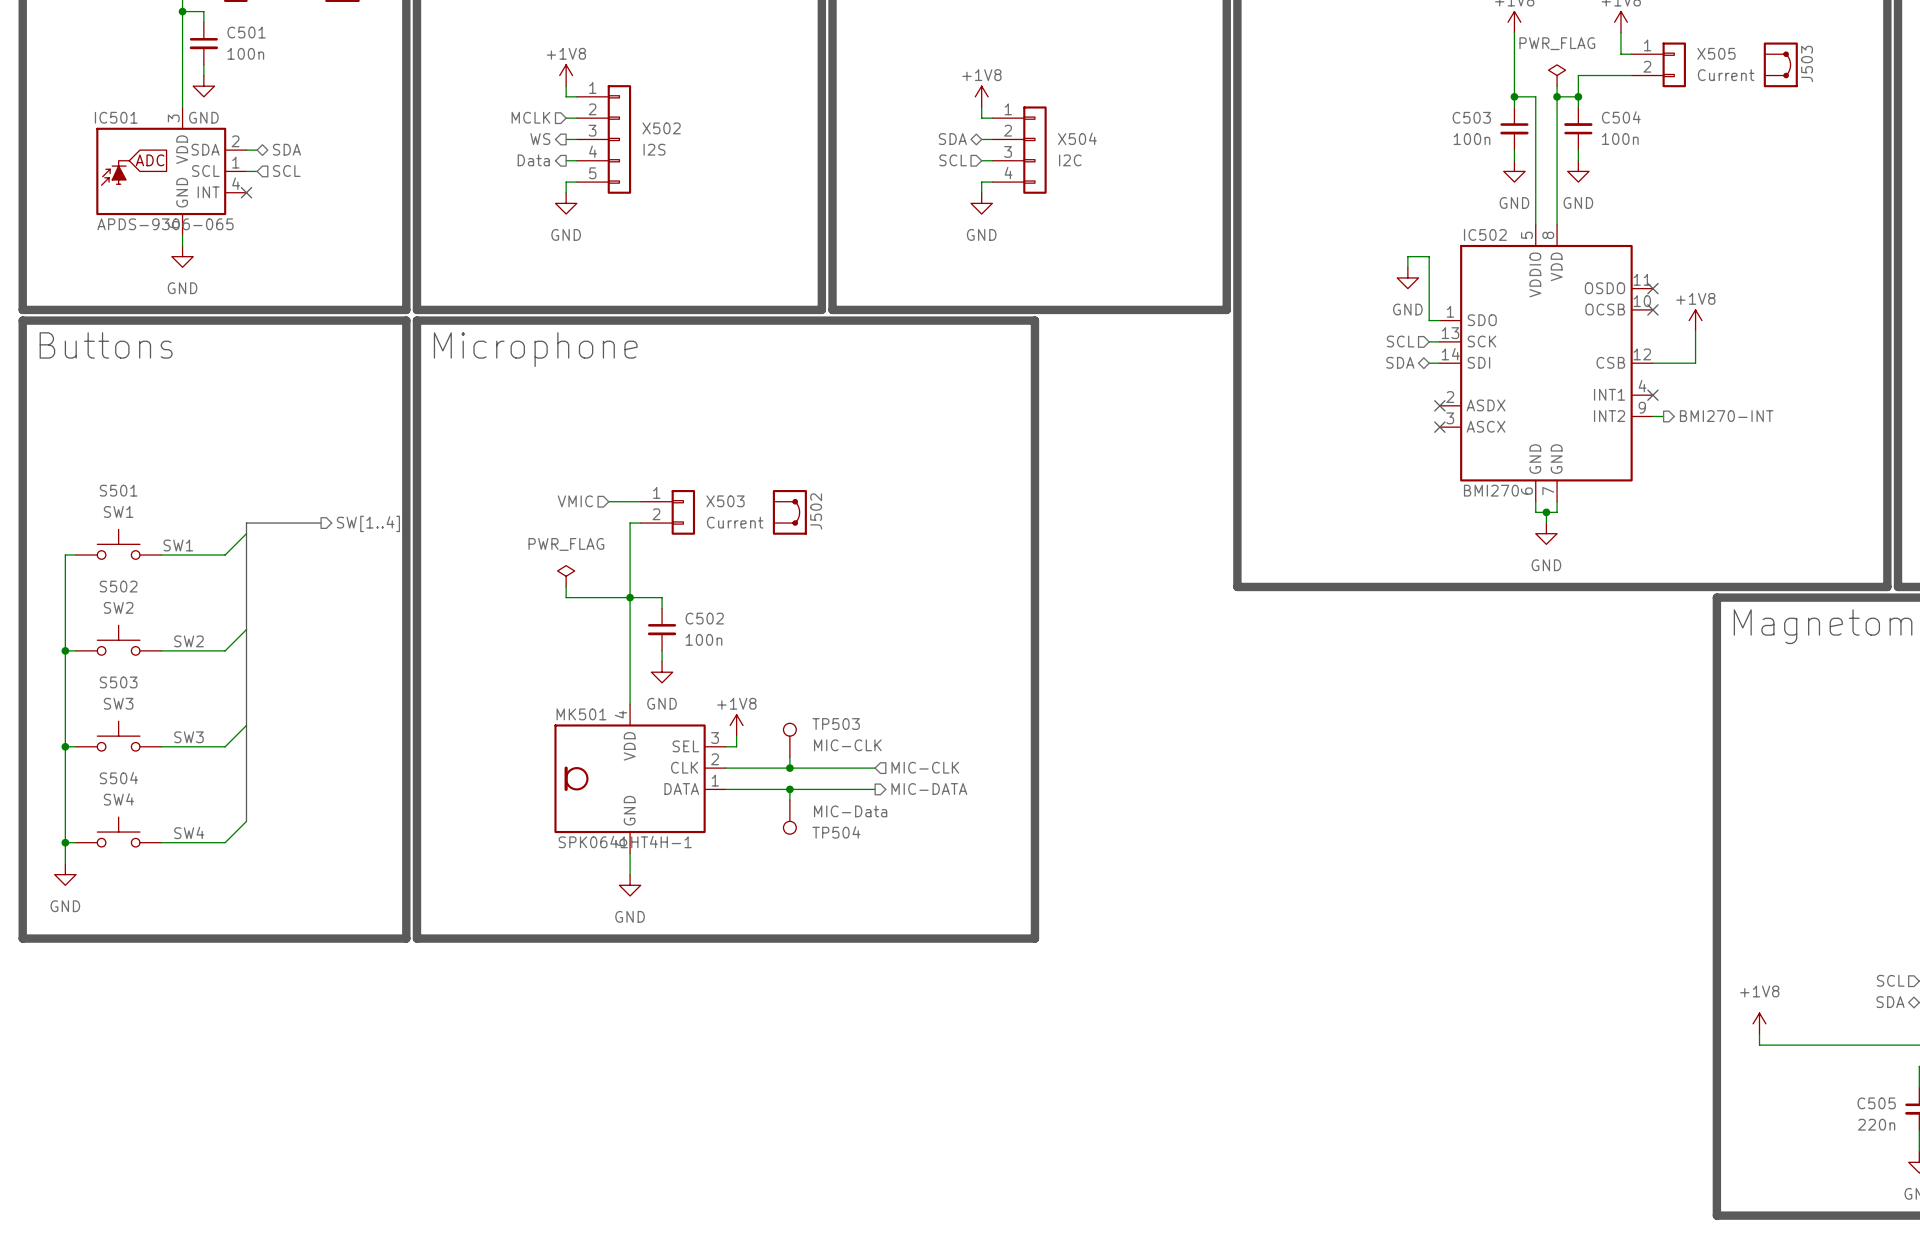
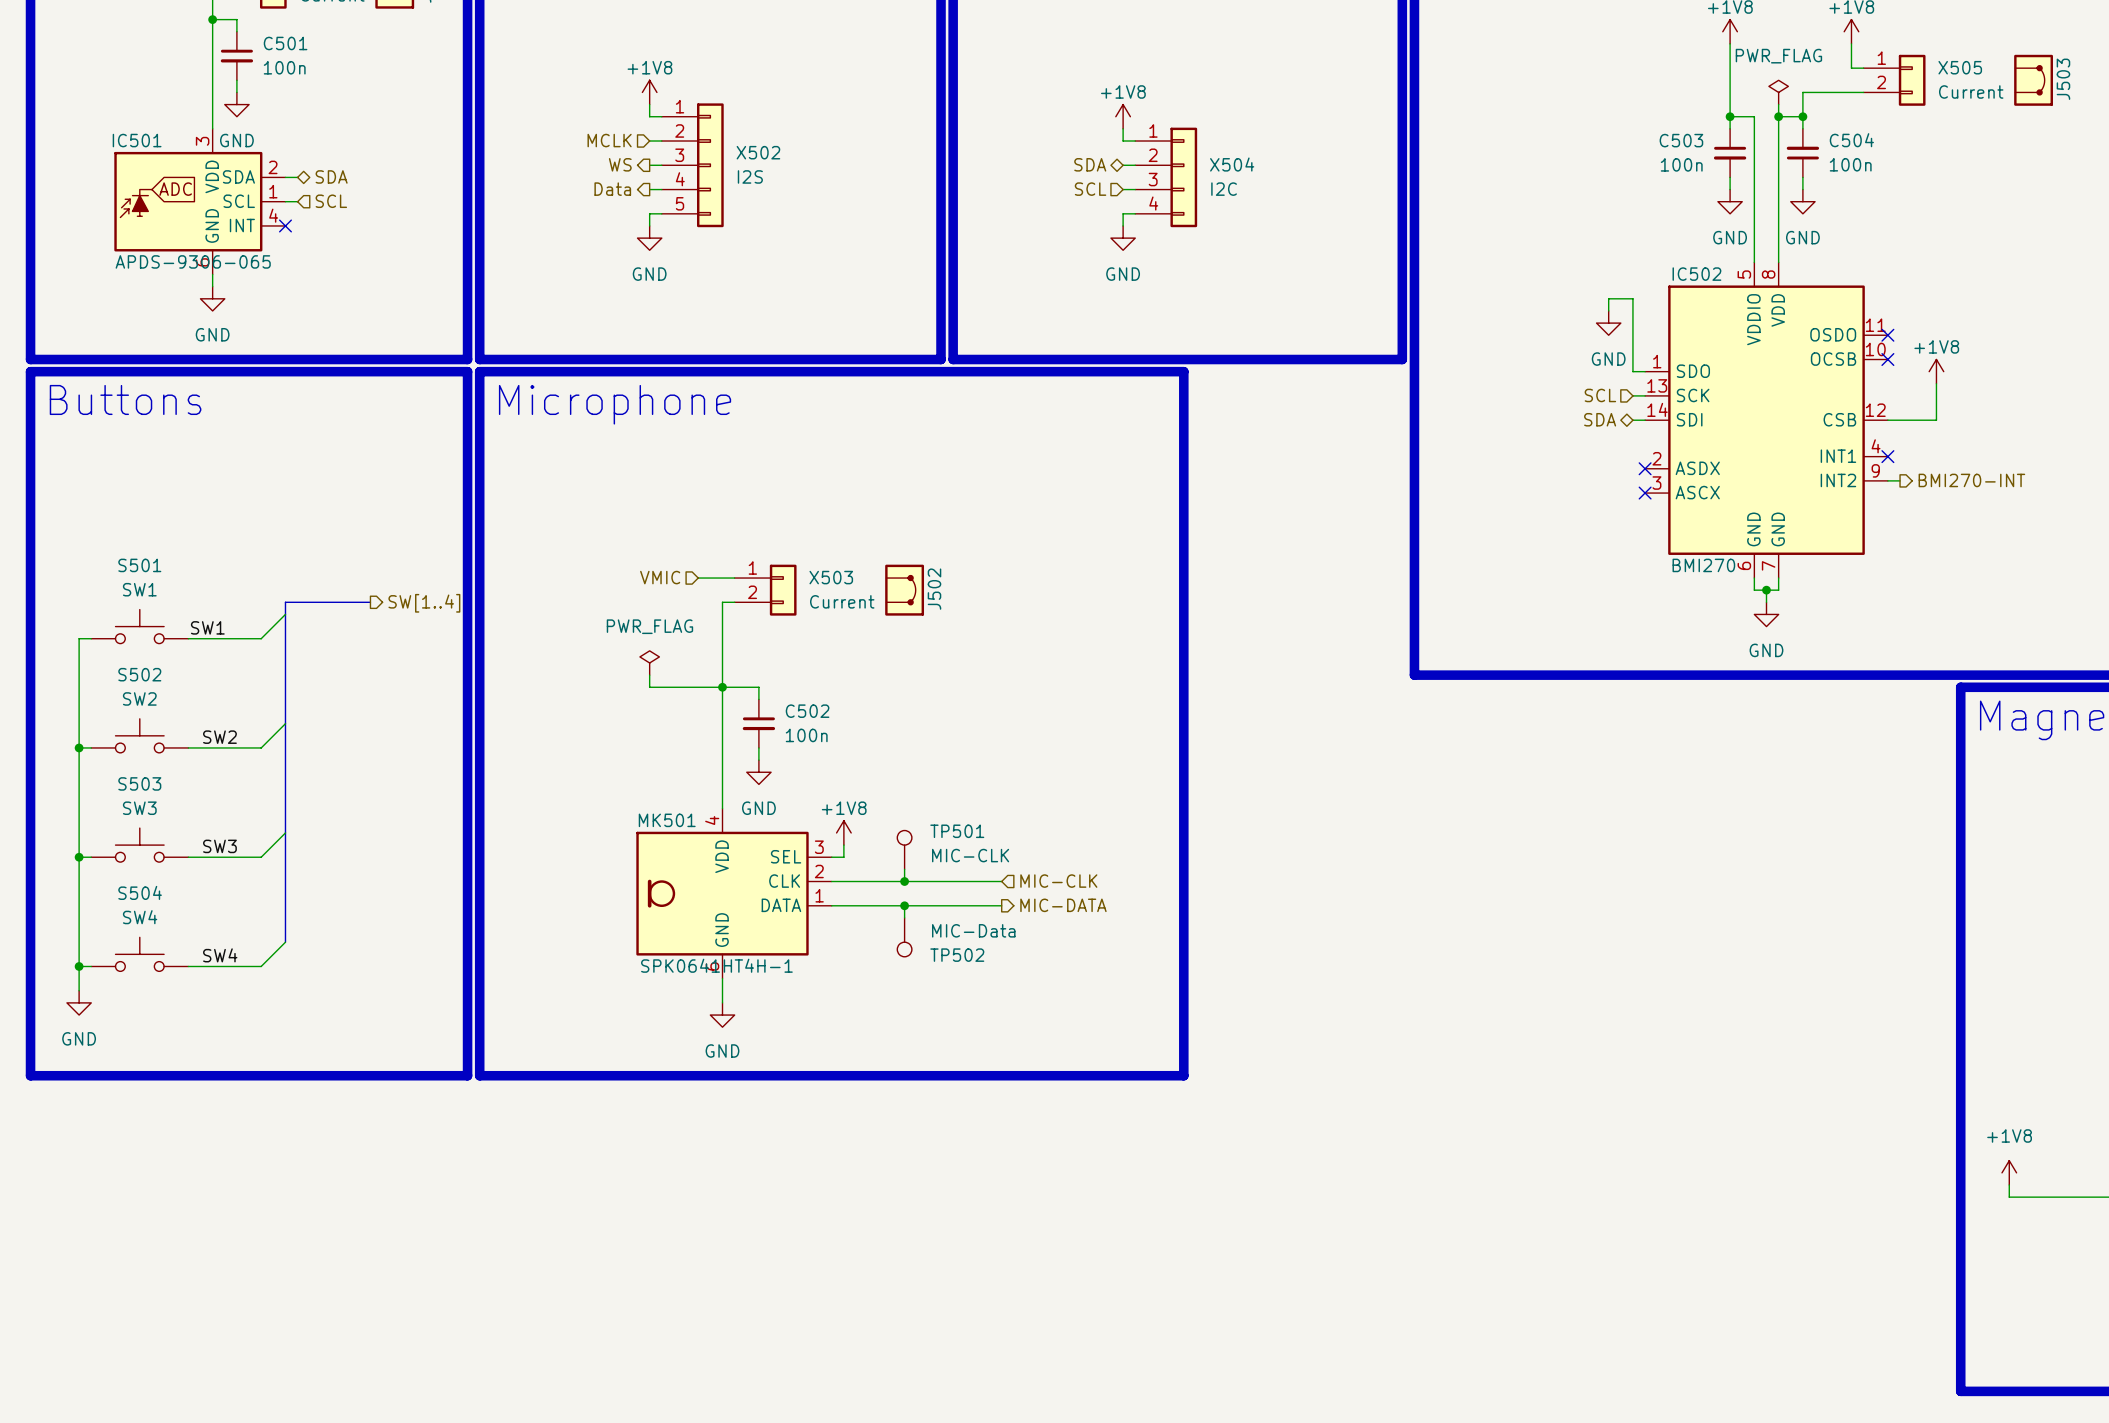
TP503 name: TP503 (836, 724) -> TP501 (957, 831)
TP504 name: TP504 (836, 832) -> TP502 (957, 955)

